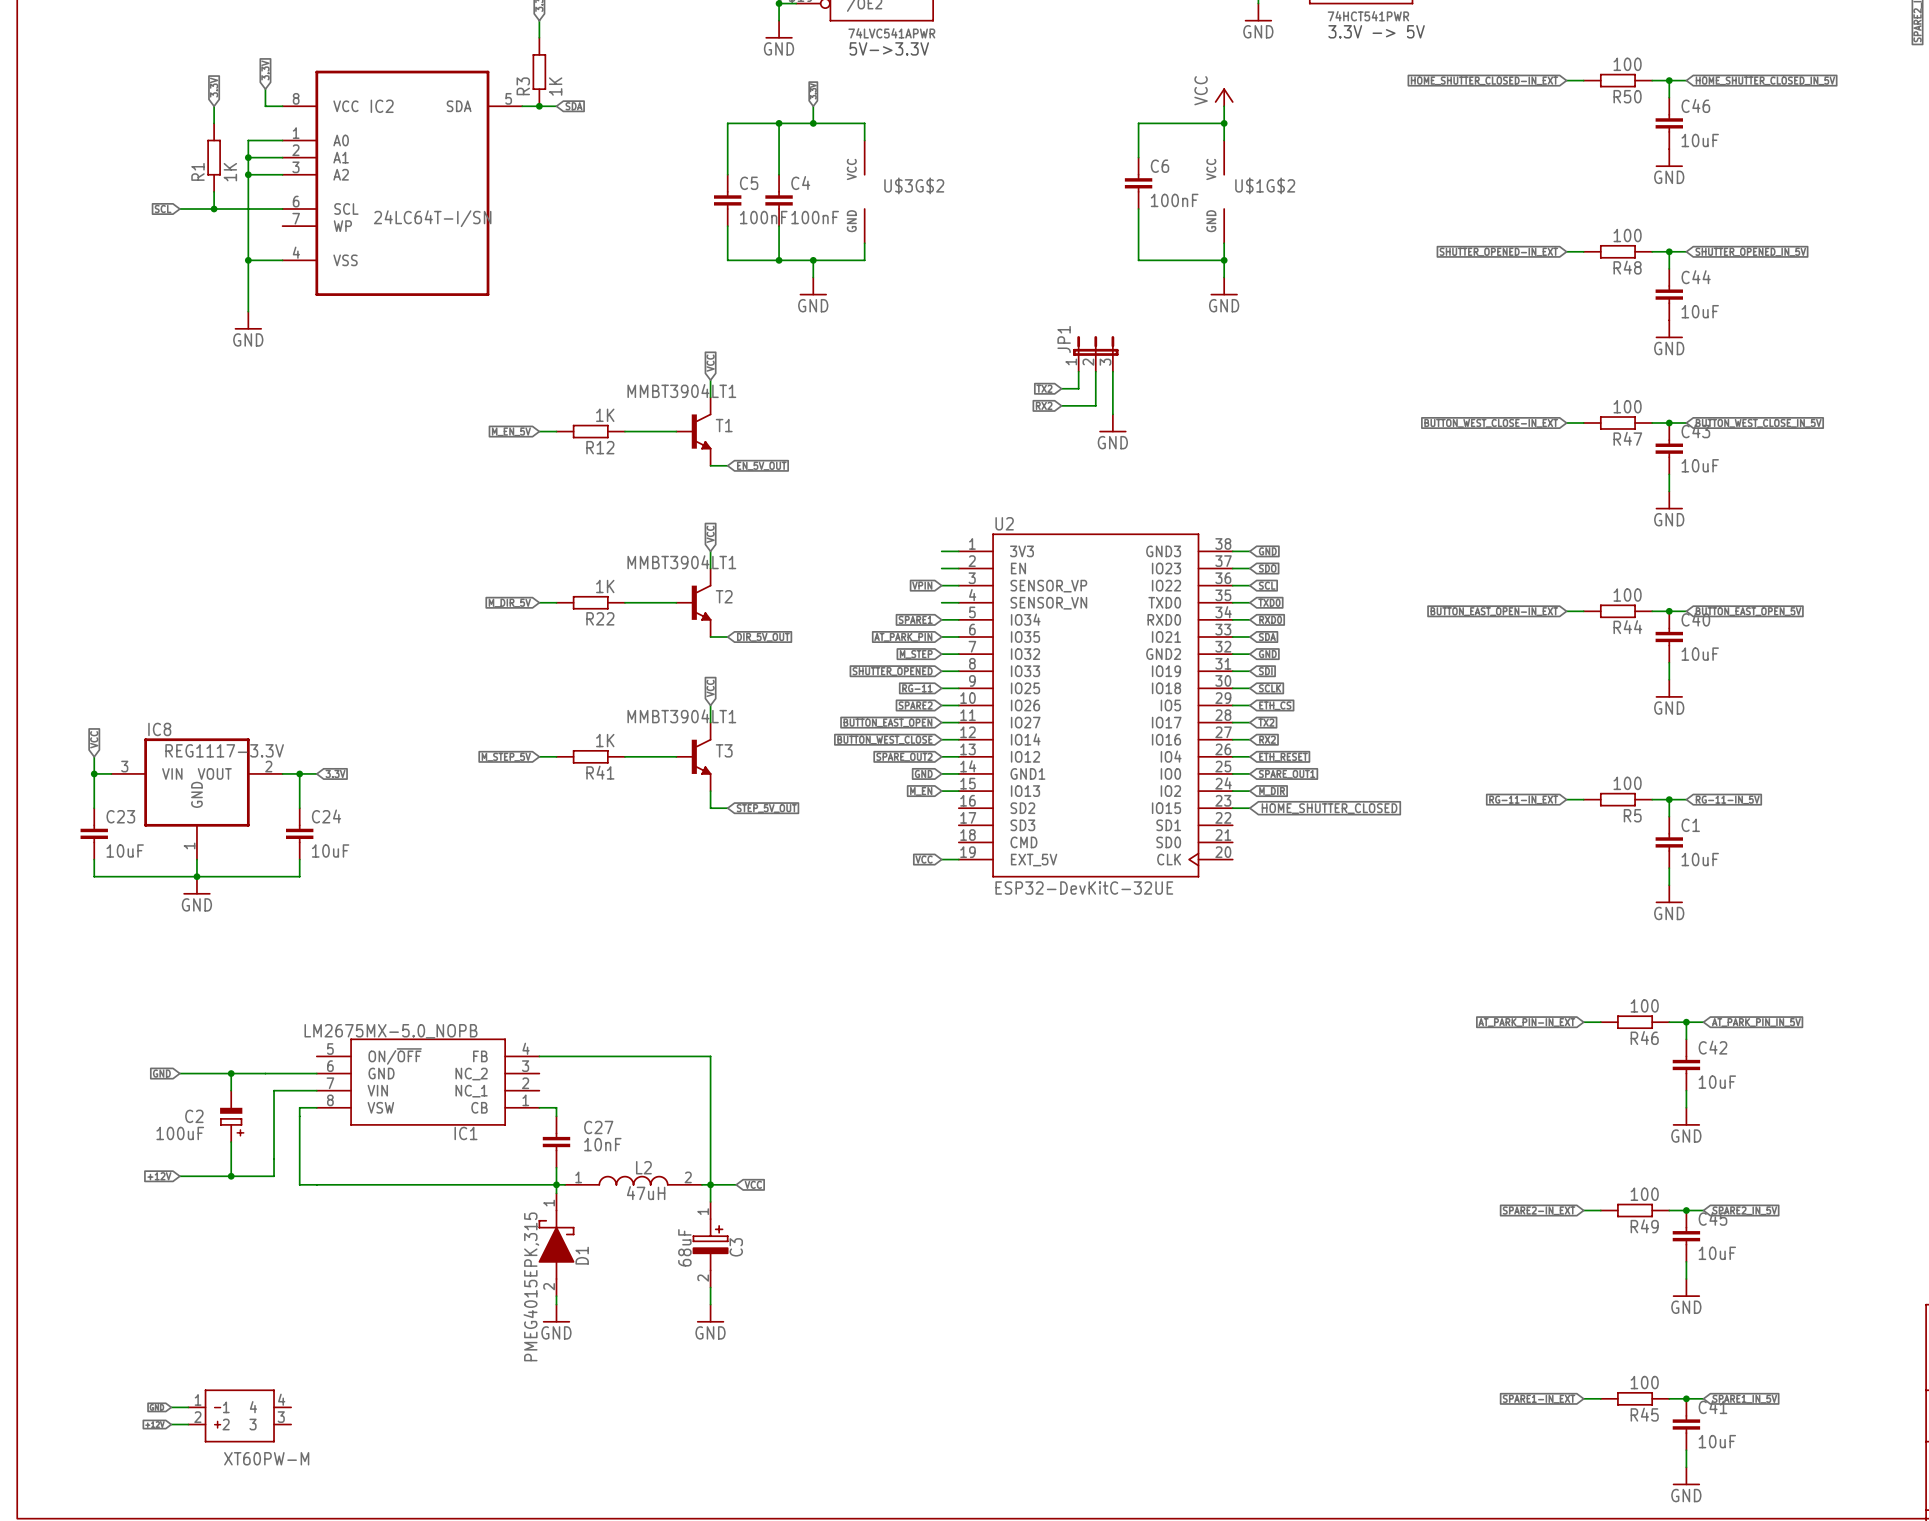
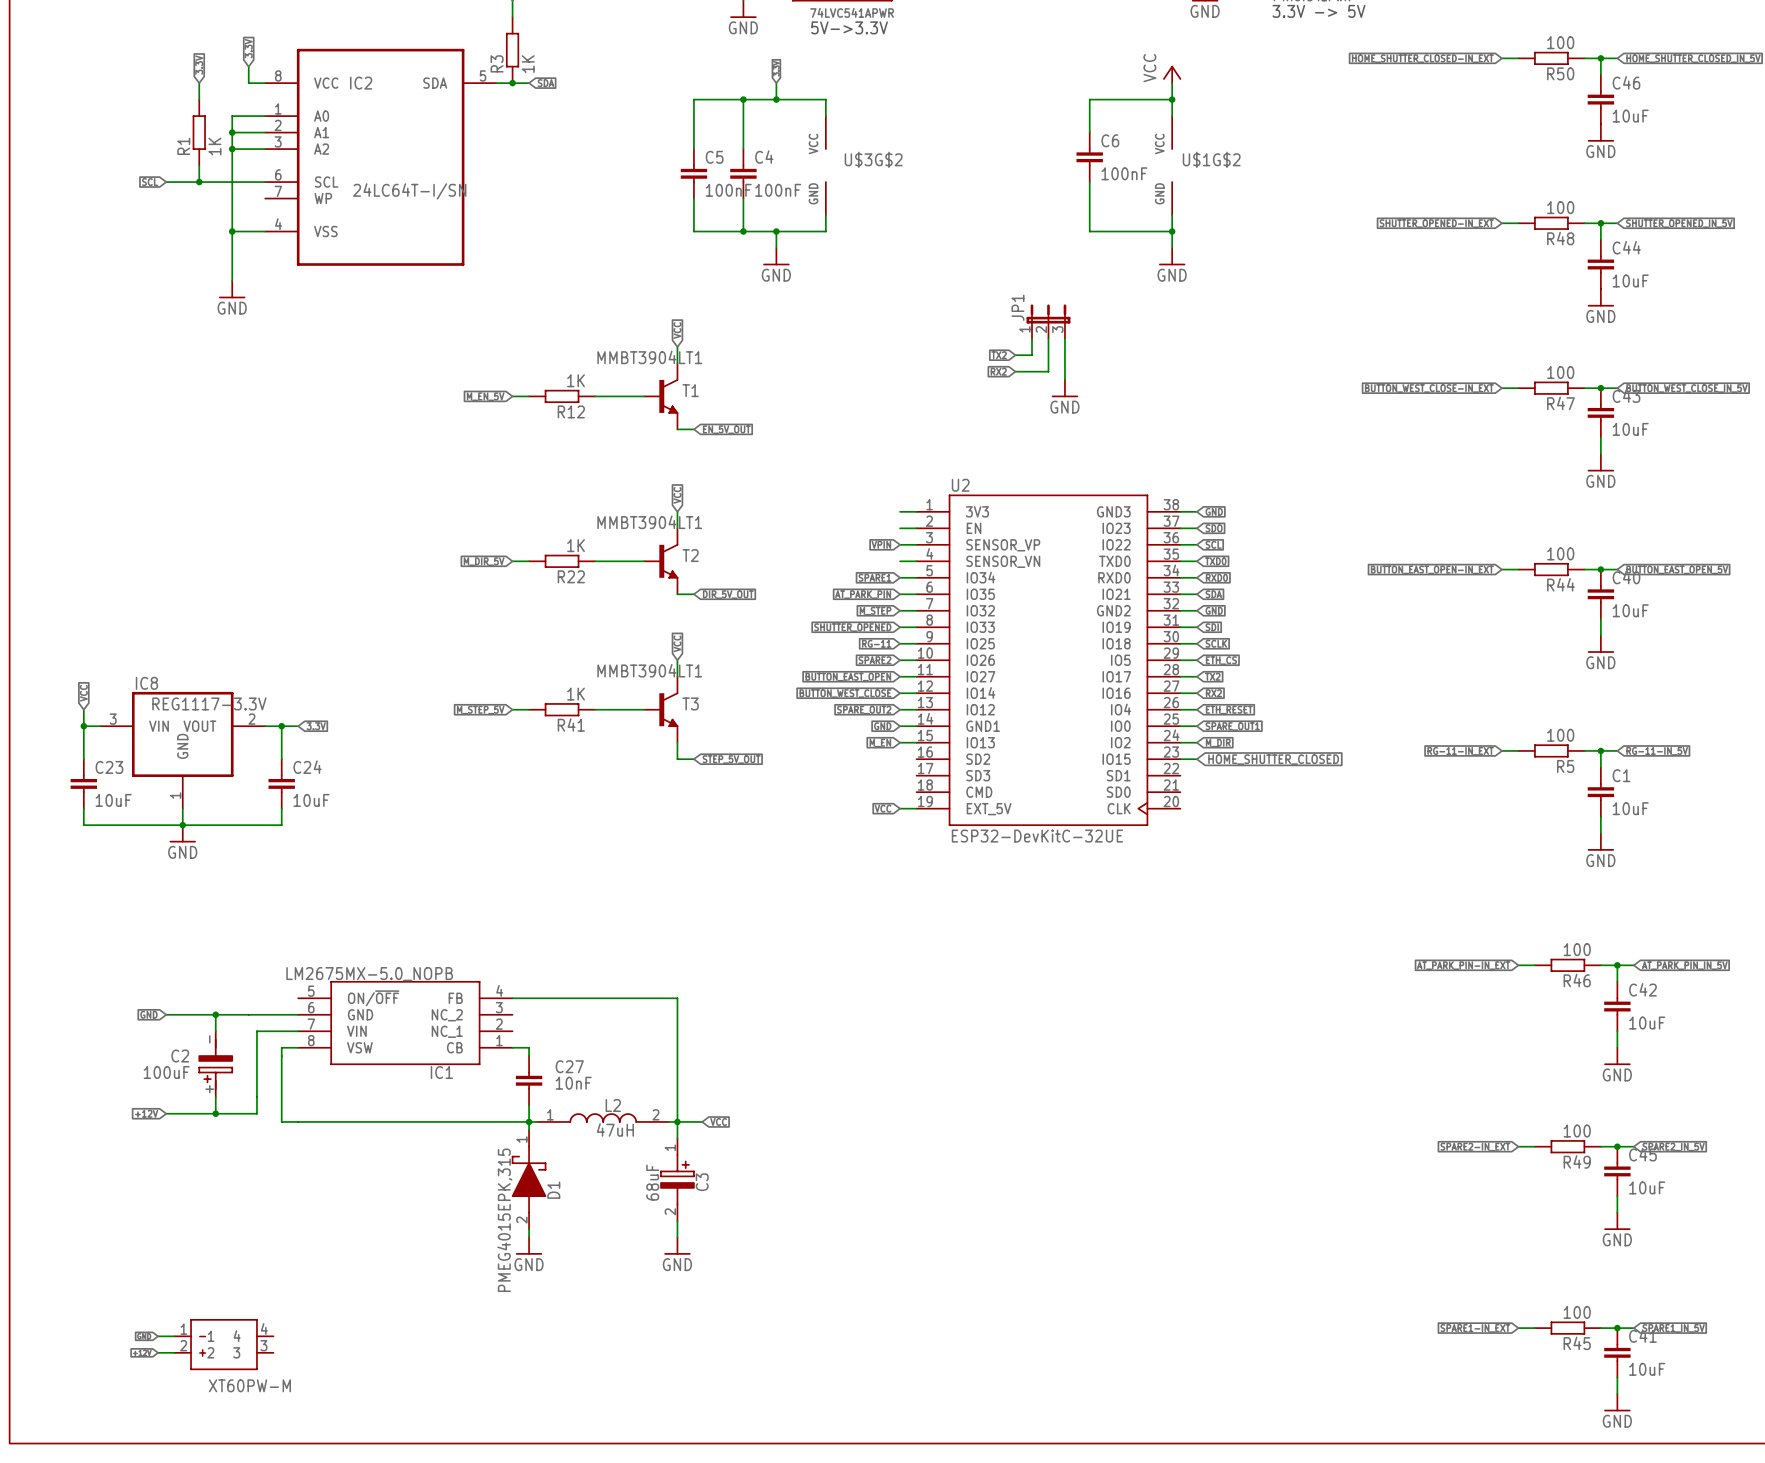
C2 symbol: [220, 1090, 243, 1143] -> [198, 1031, 234, 1098]

